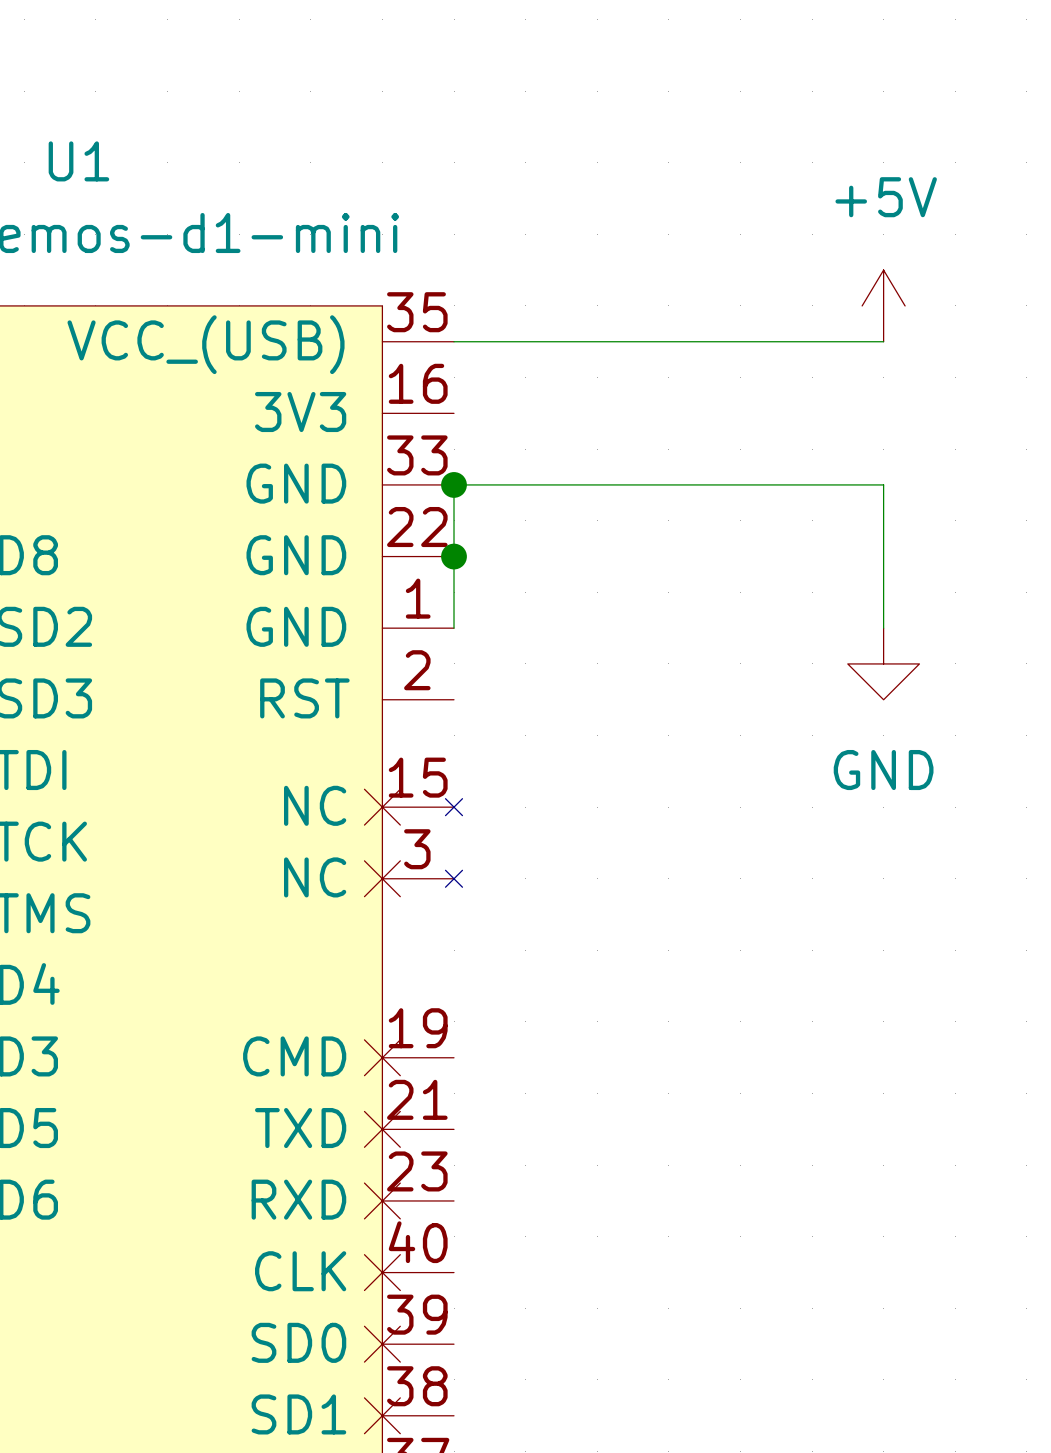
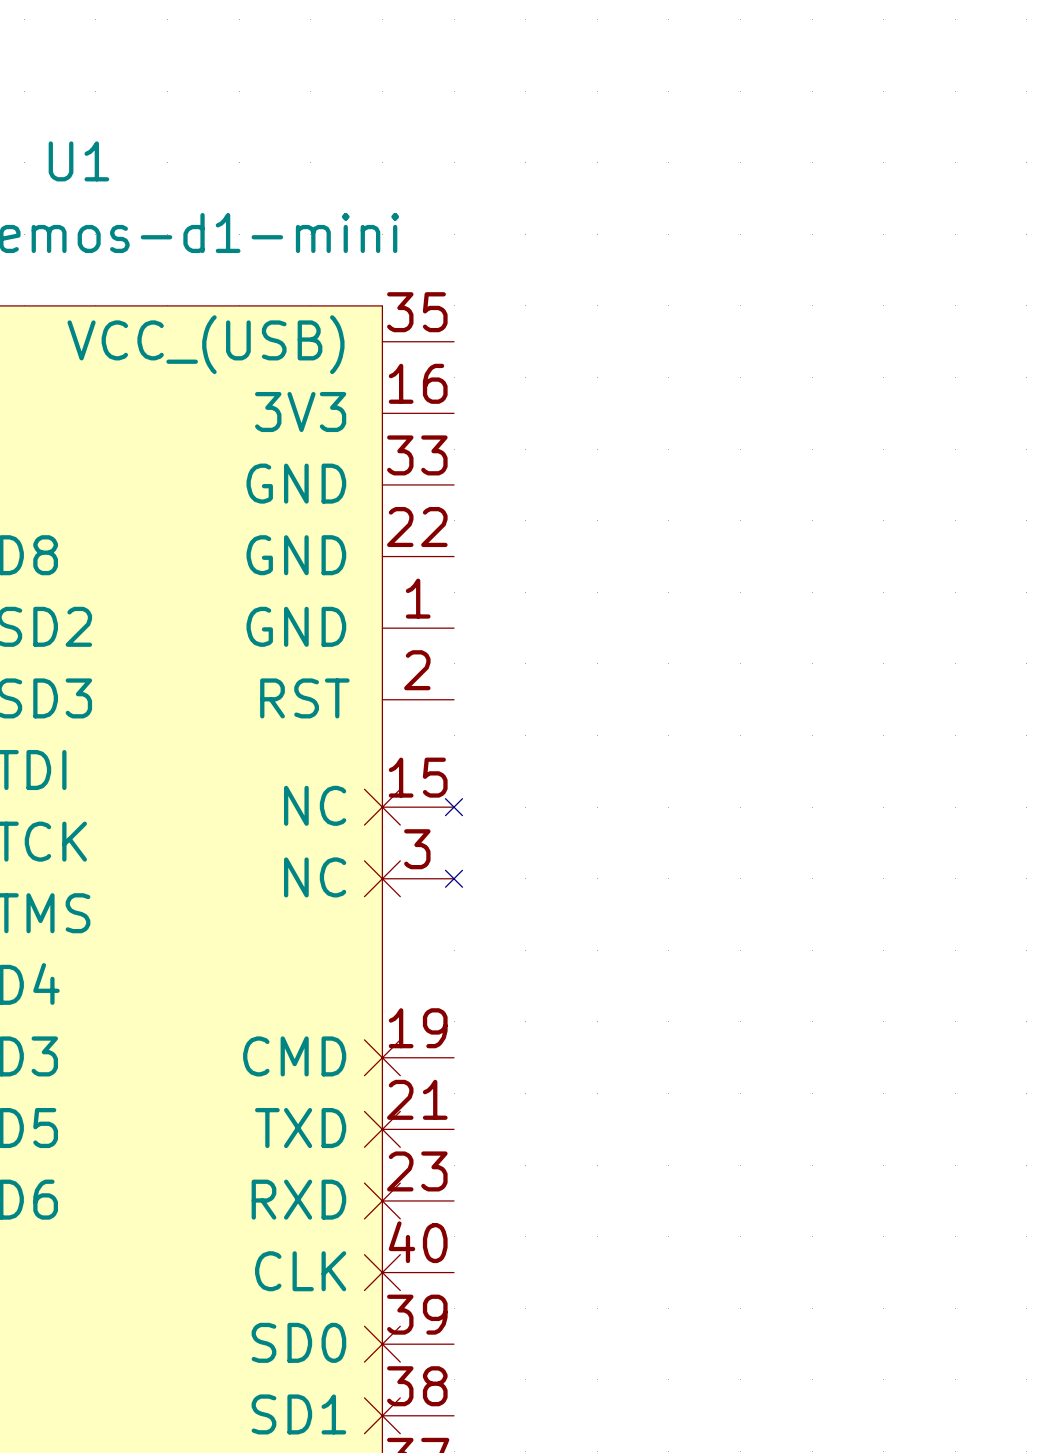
power symbol: +5V (883, 305) -> none
wire: (454, 341) (883, 341) -> none
junction: (454, 484) -> none
junction: (454, 556) -> none
wire: (454, 628) (454, 484) (883, 484) (883, 628) -> none
power symbol: GND (883, 663) -> none

